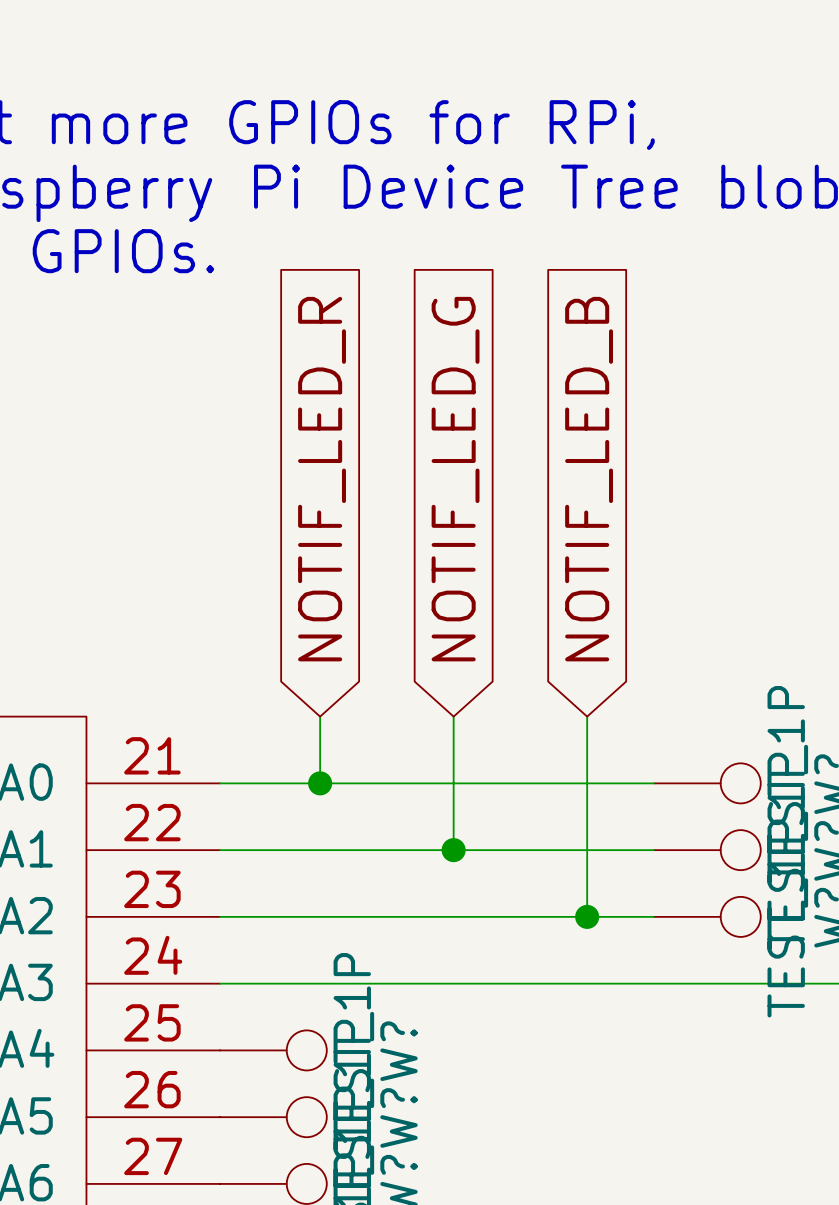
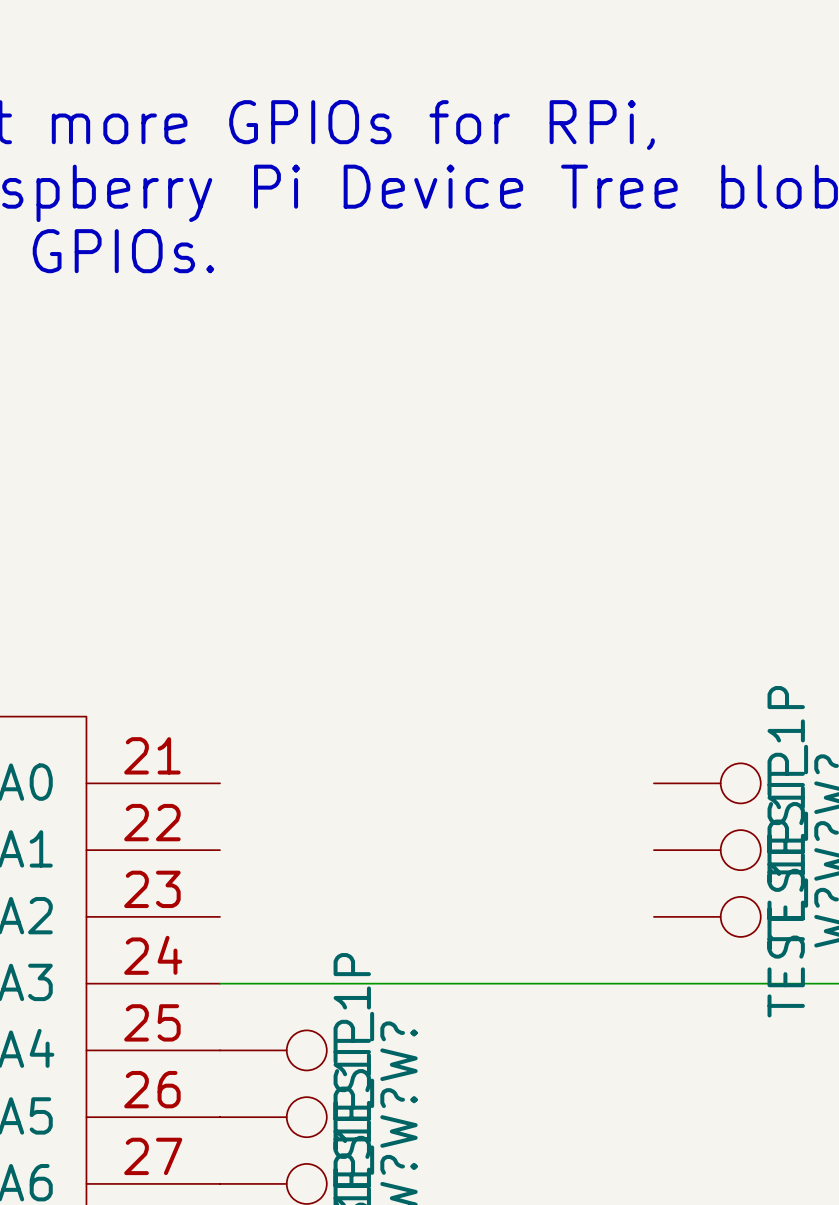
global label: NOTIF_LED_R (322, 479) -> none
global label: NOTIF_LED_G (455, 479) -> none
global label: NOTIF_LED_B (589, 479) -> none
wire: (320, 716) (320, 783) -> none
wire: (453, 716) (453, 850) -> none
wire: (587, 716) (587, 916) -> none
wire: (219, 783) (653, 783) -> none
junction: (320, 783) -> none
wire: (219, 850) (653, 850) -> none
junction: (453, 850) -> none
wire: (219, 916) (653, 916) -> none
junction: (587, 916) -> none

